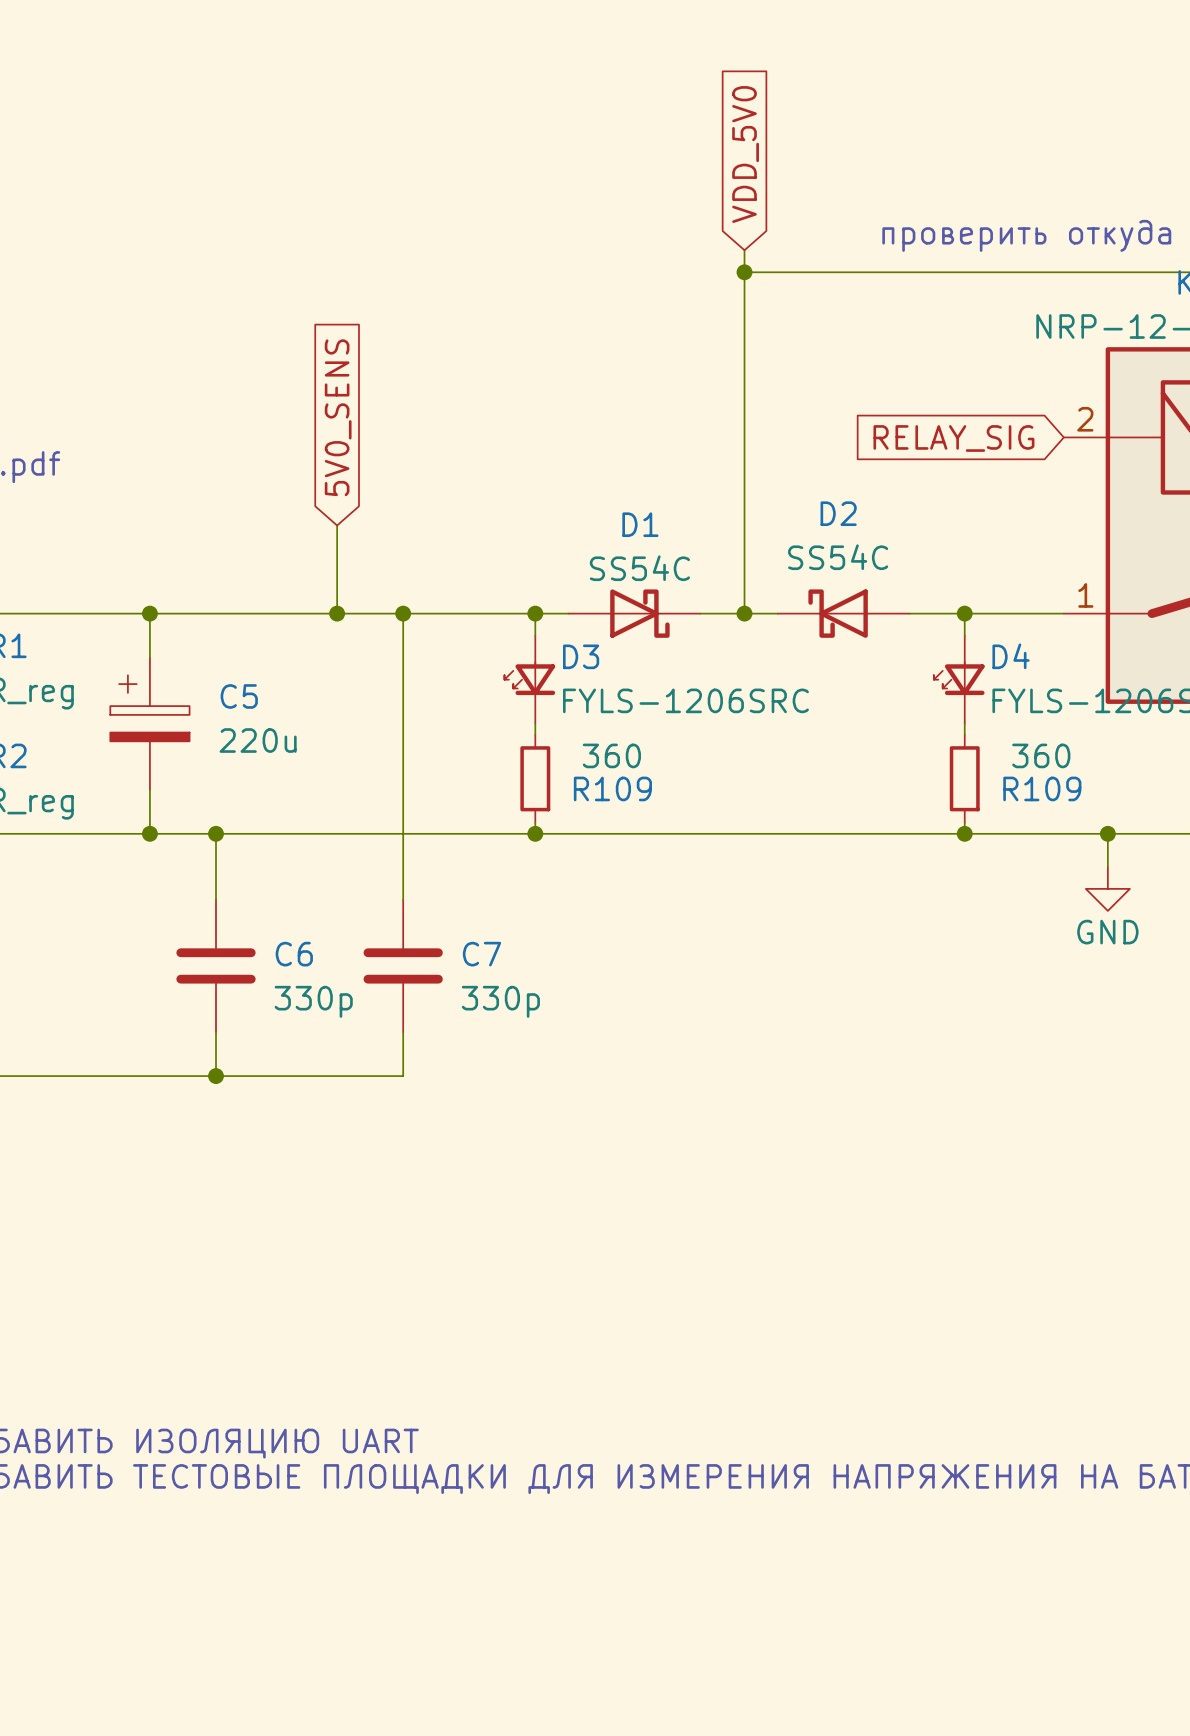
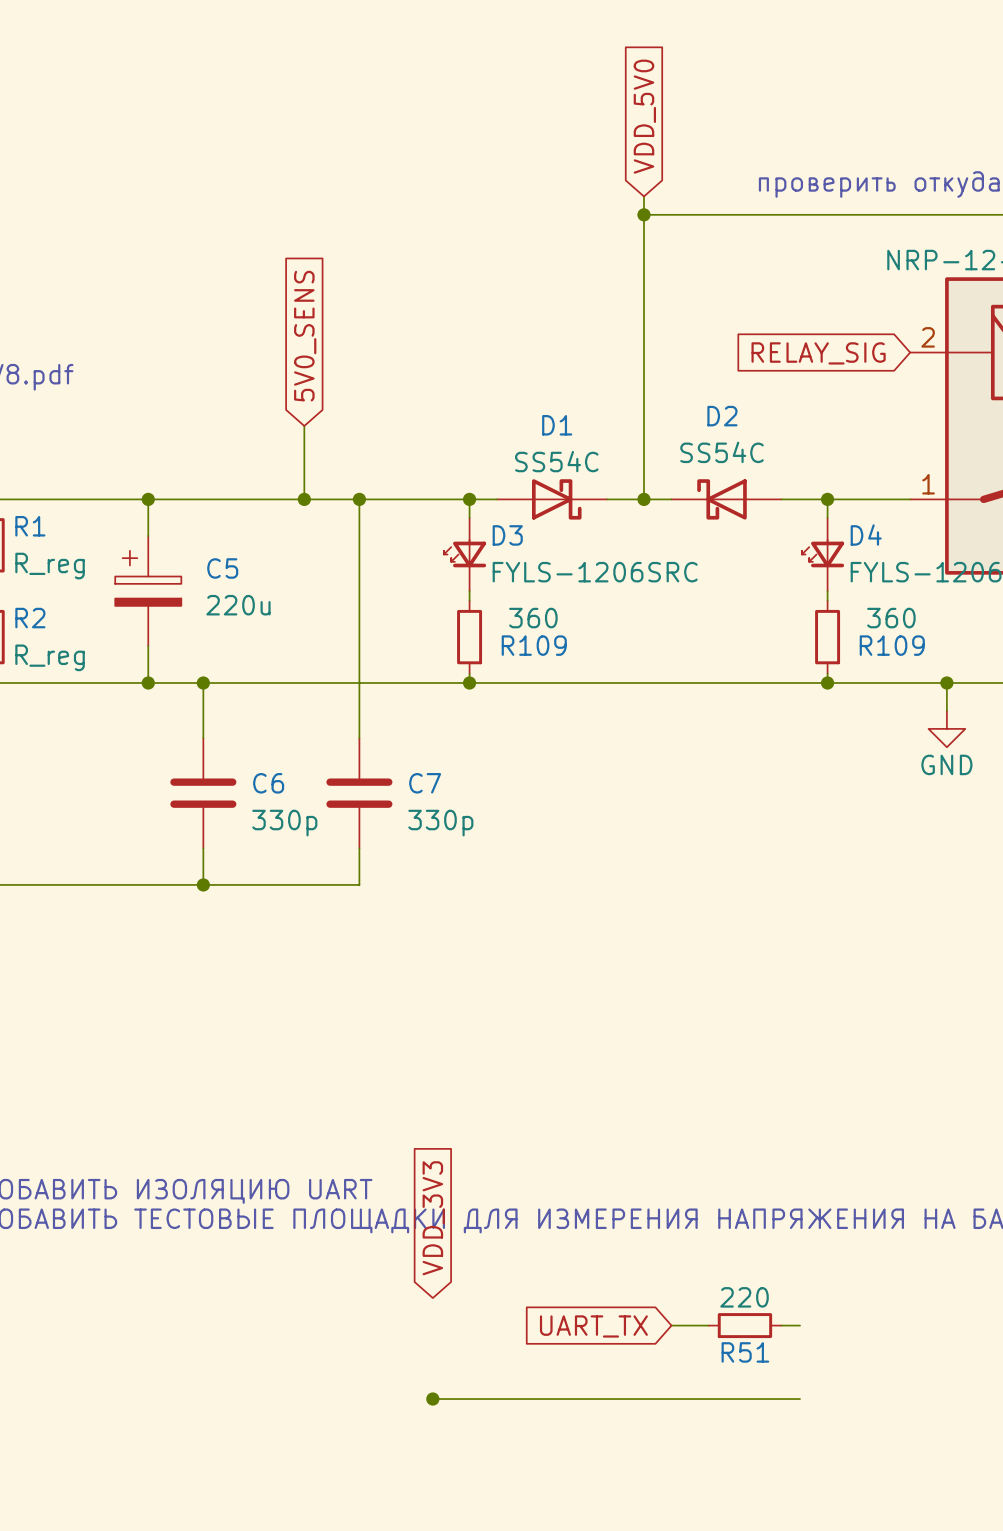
global label: none -> VDD_3V3 (433, 1218)
wire: none -> (671, 1325) (708, 1325)
R51: none -> 220 (744, 1325)
wire: none -> (781, 1325) (800, 1325)
global label: none -> UART_TX (593, 1326)
wire: none -> (432, 1399) (800, 1399)
junction: none -> (432, 1399)

